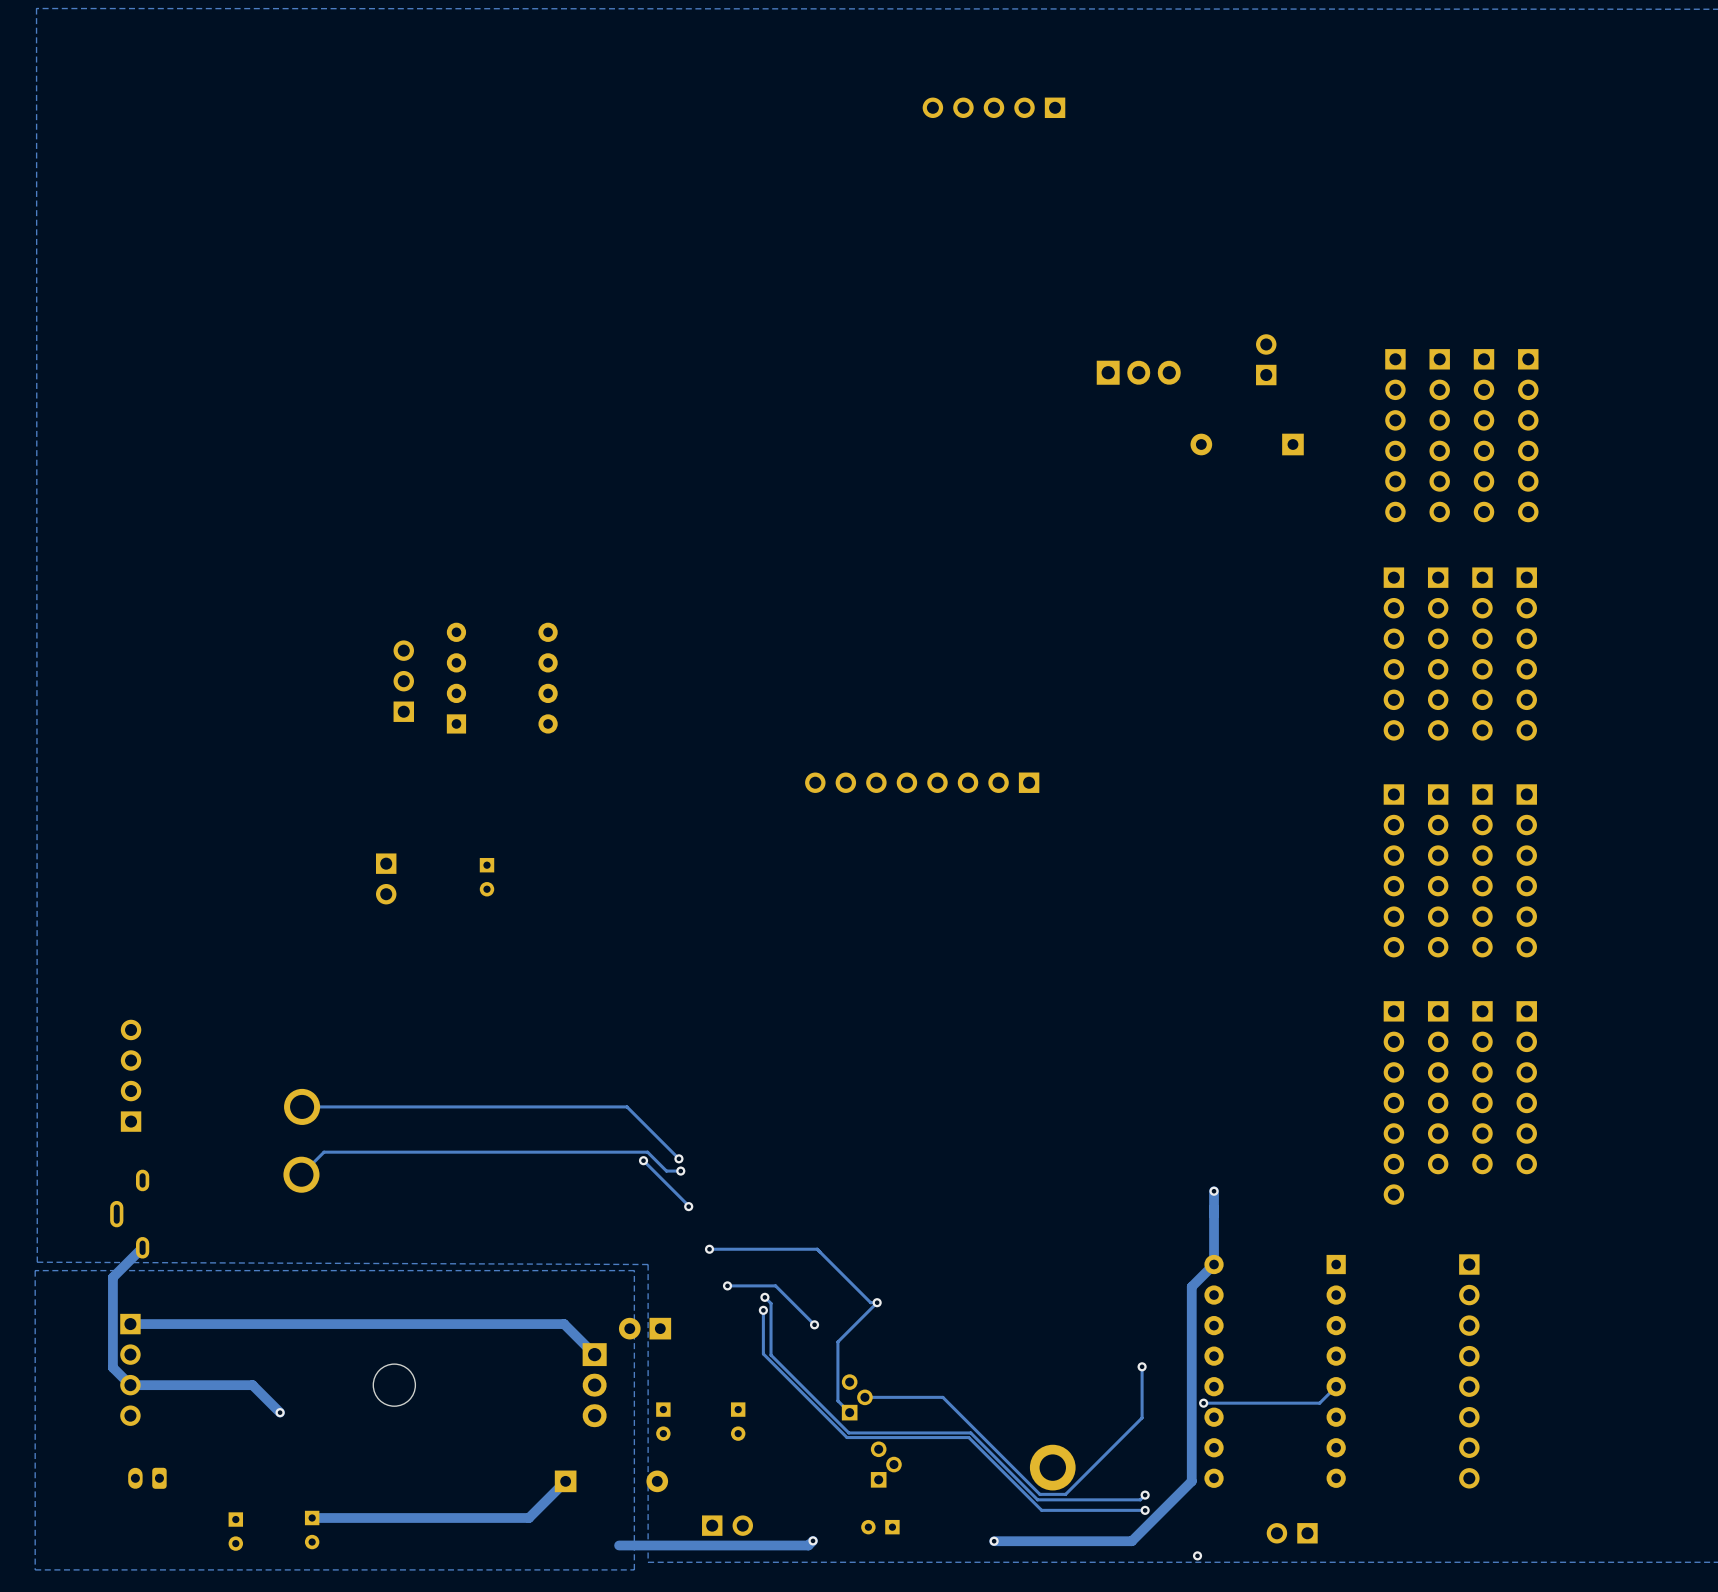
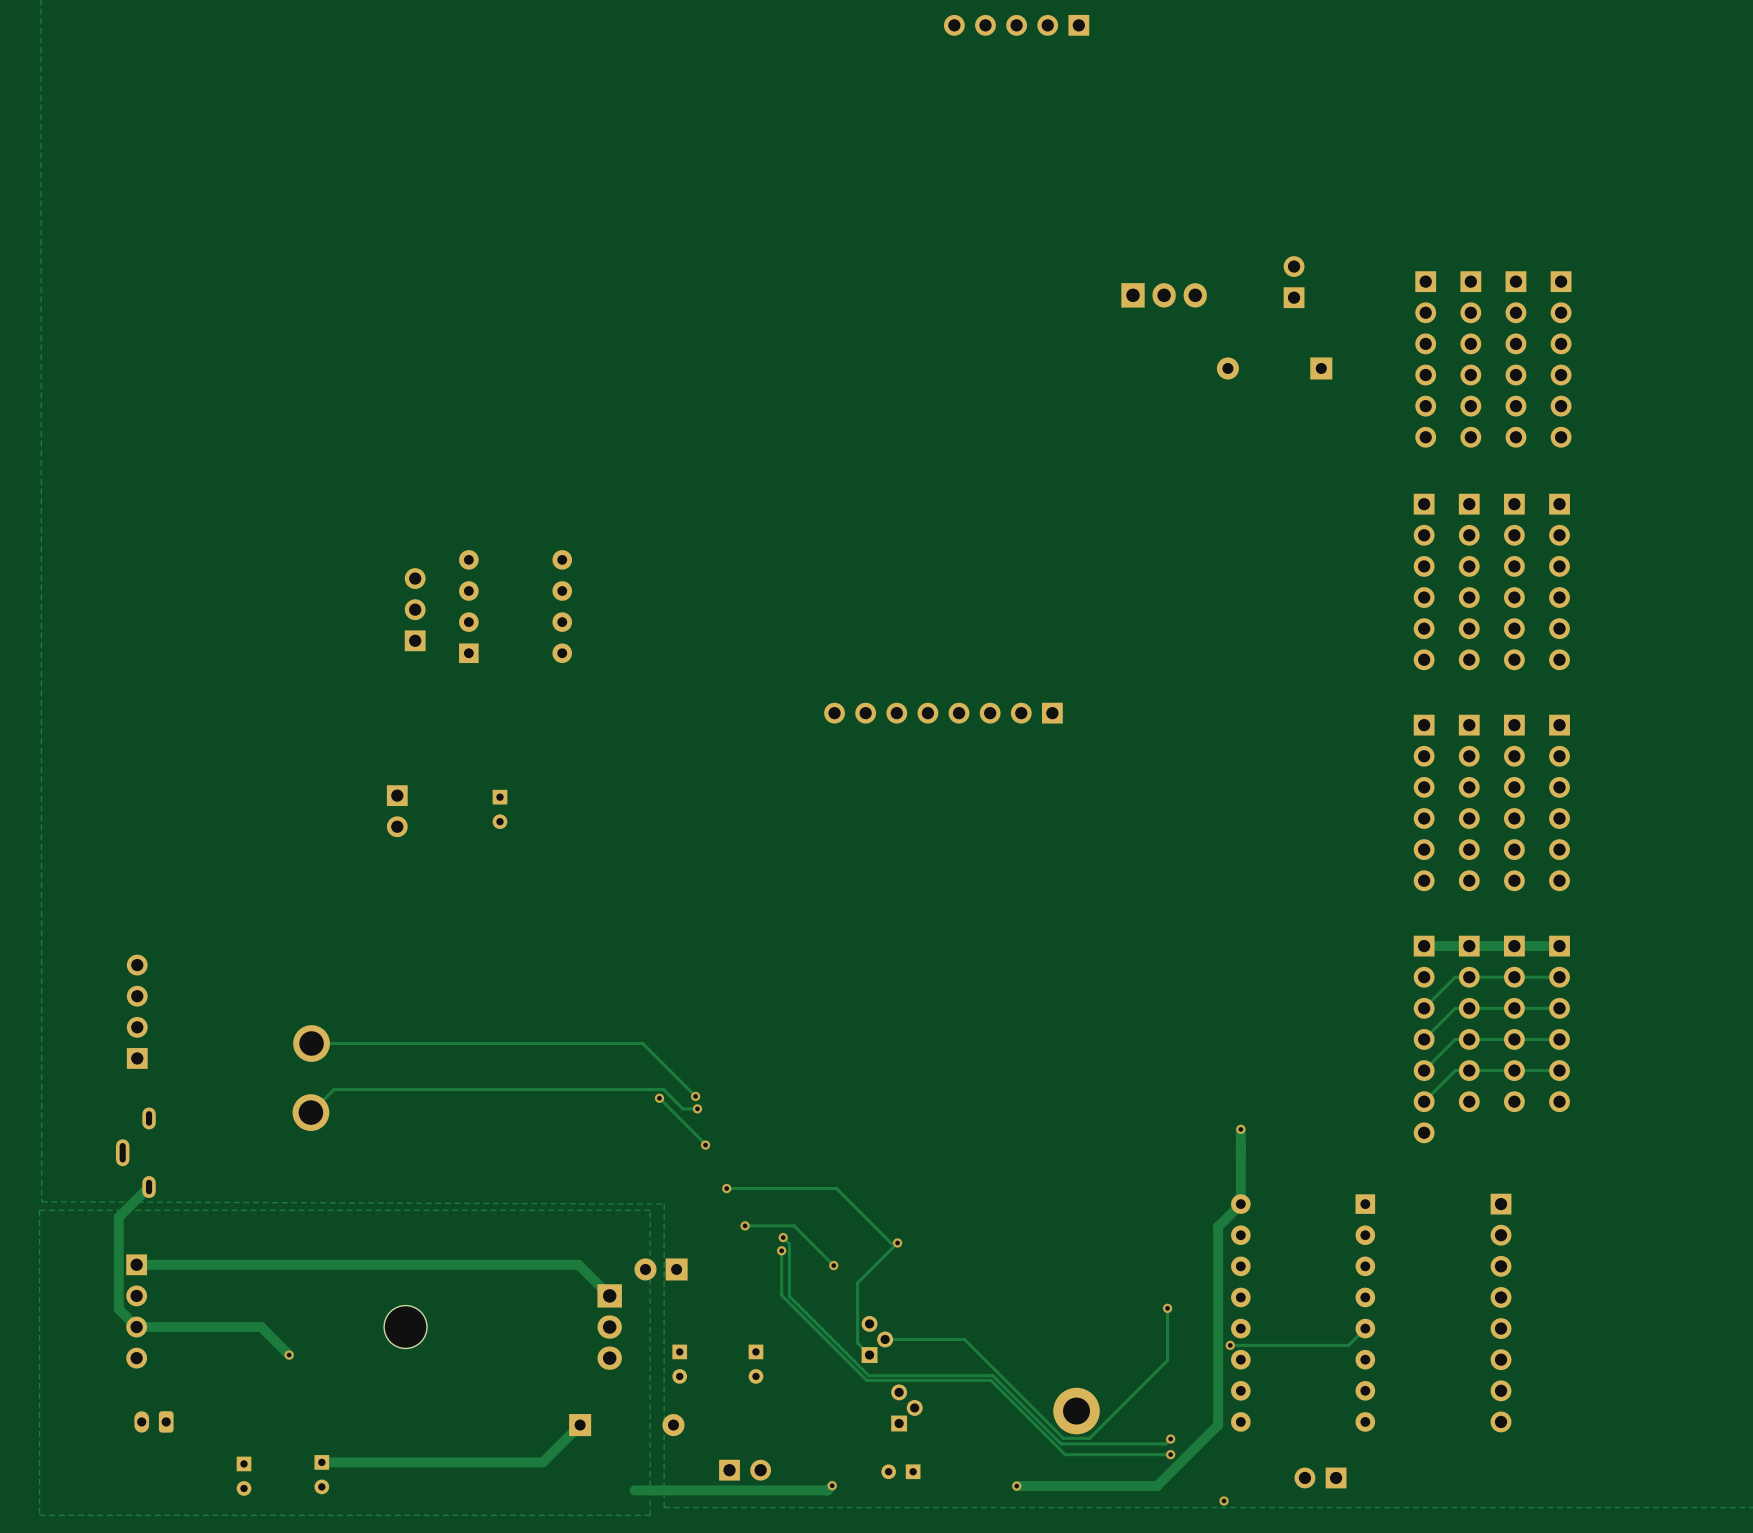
track: none -> (1559, 946) (1424, 946)
track: none -> (1559, 977) (1455, 977) (1424, 1008)
track: none -> (1559, 1008) (1455, 1008) (1424, 1039)
track: none -> (1559, 1039) (1455, 1039) (1424, 1070)
track: none -> (1559, 1070) (1455, 1070) (1424, 1101)

